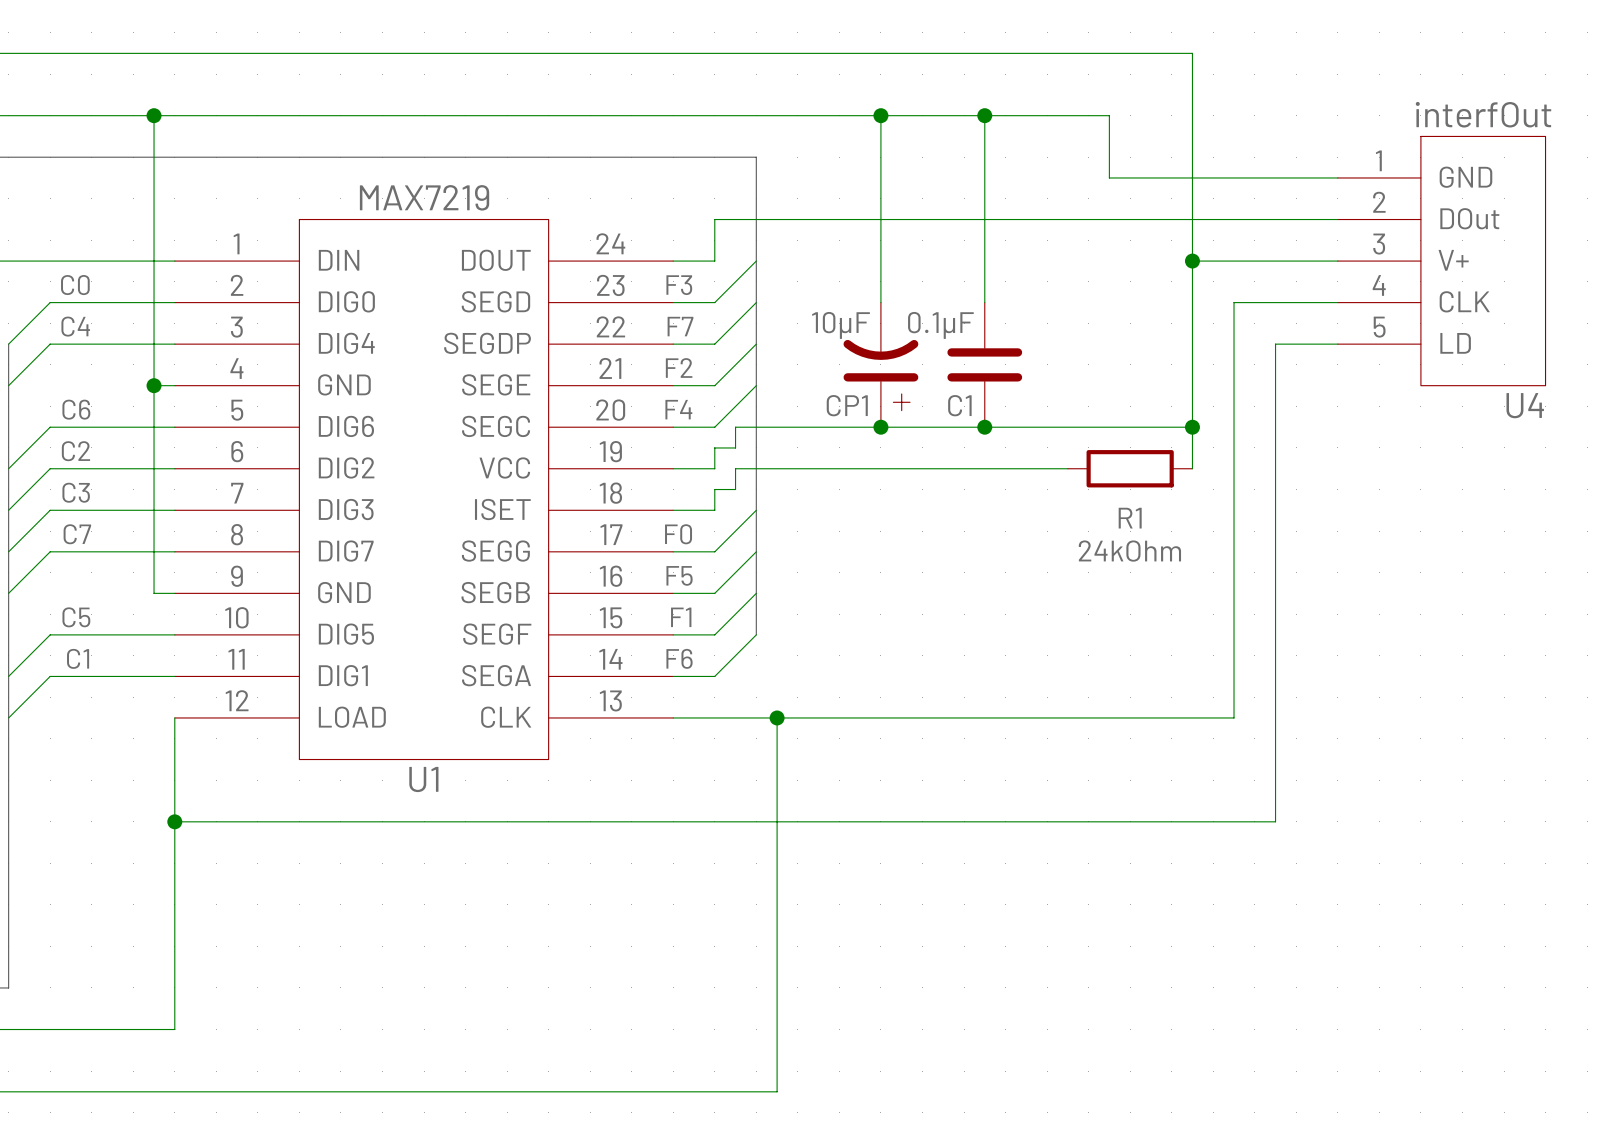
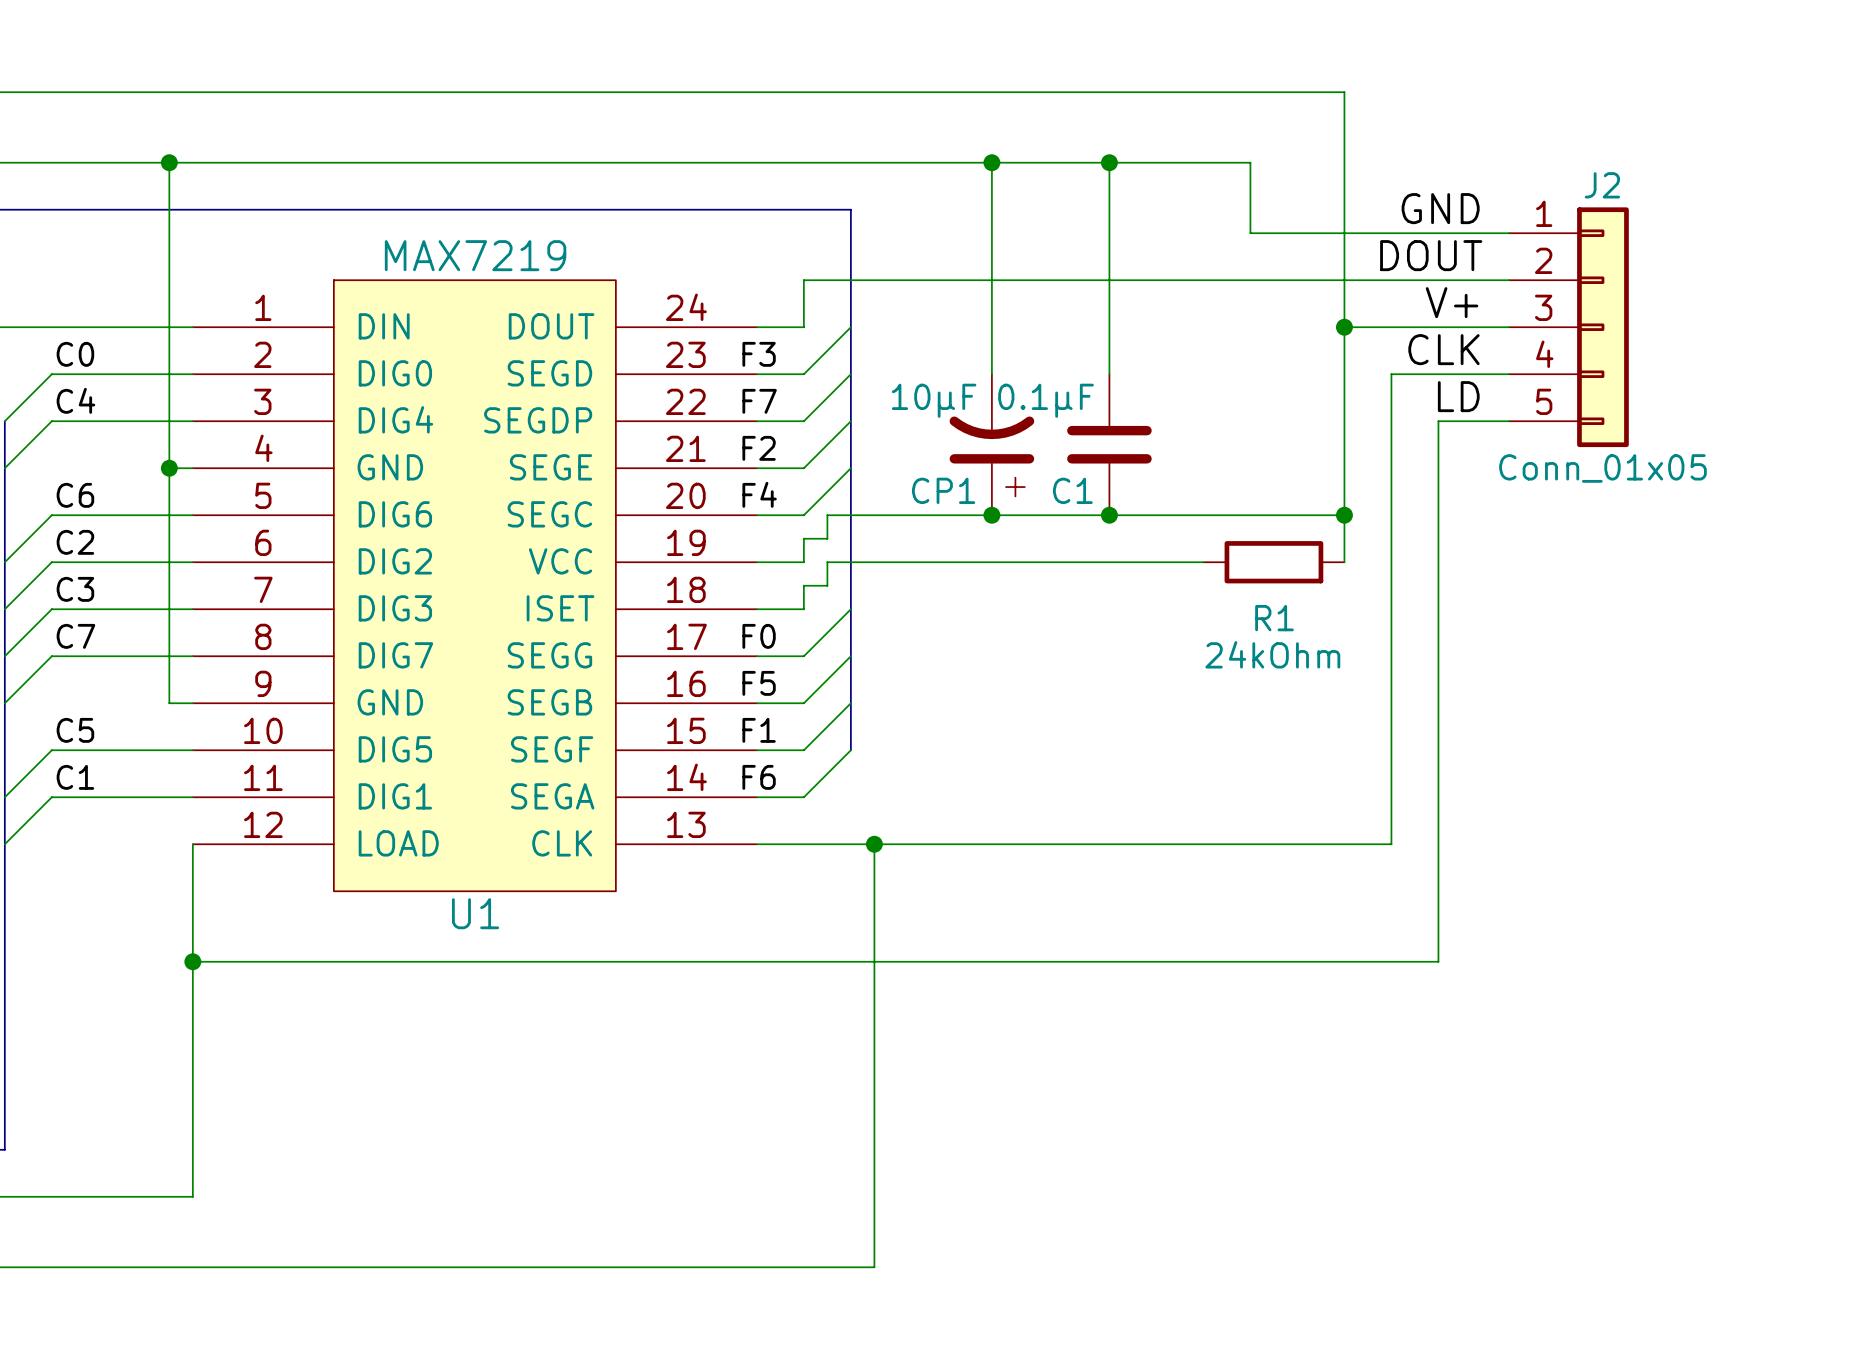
label: none -> GND (1440, 208)
label: none -> DOUT (1431, 255)
label: none -> V+ (1452, 302)
J2: none -> Conn_01x05 (1568, 327)
U4: interfOut (1441, 261) -> none
label: none -> CLK (1443, 349)
label: none -> LD (1458, 396)

